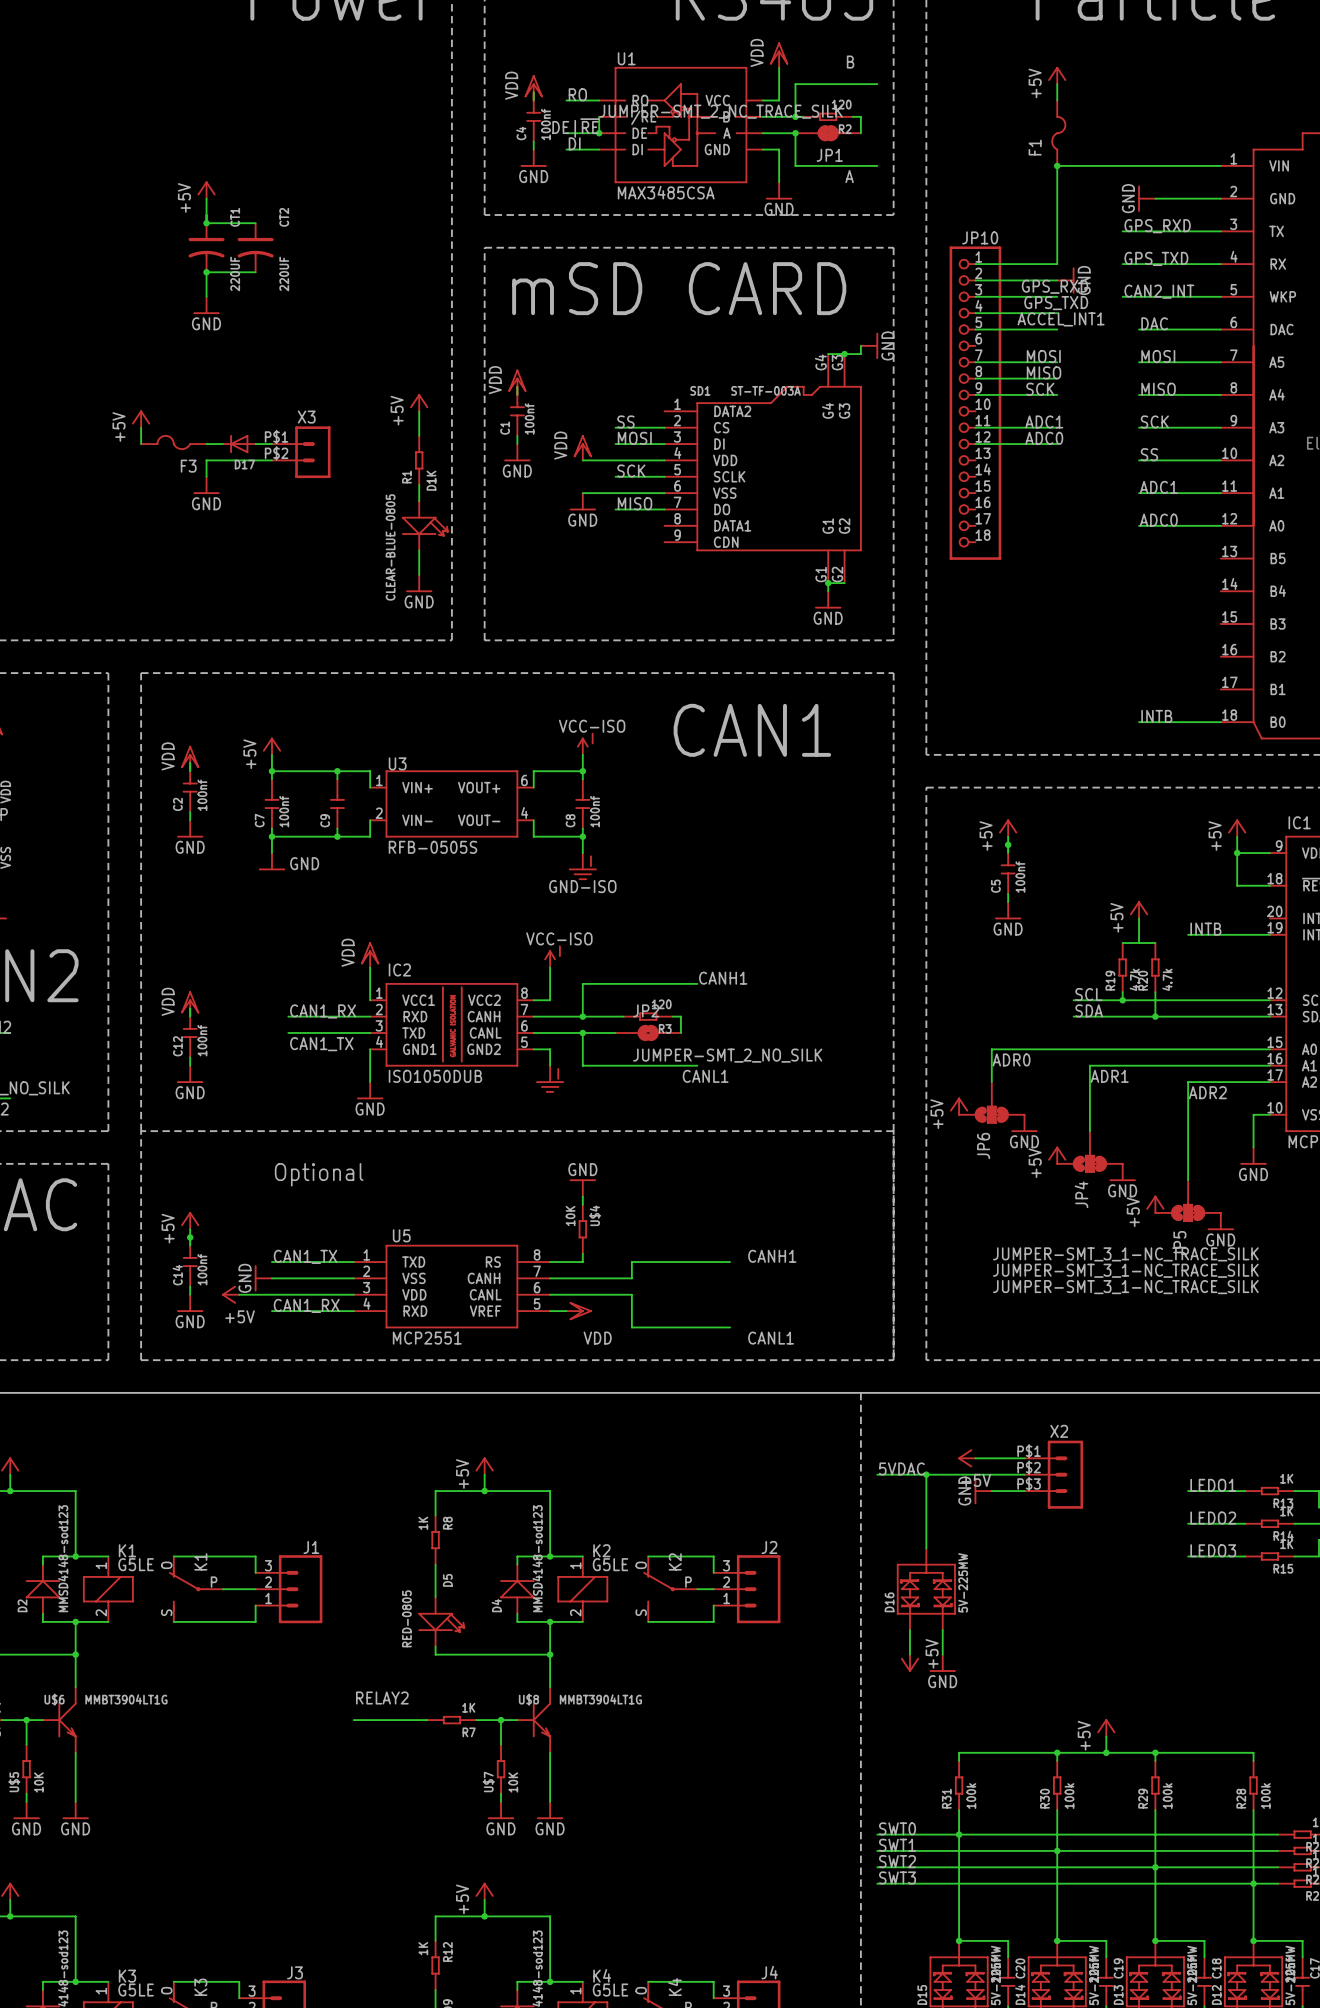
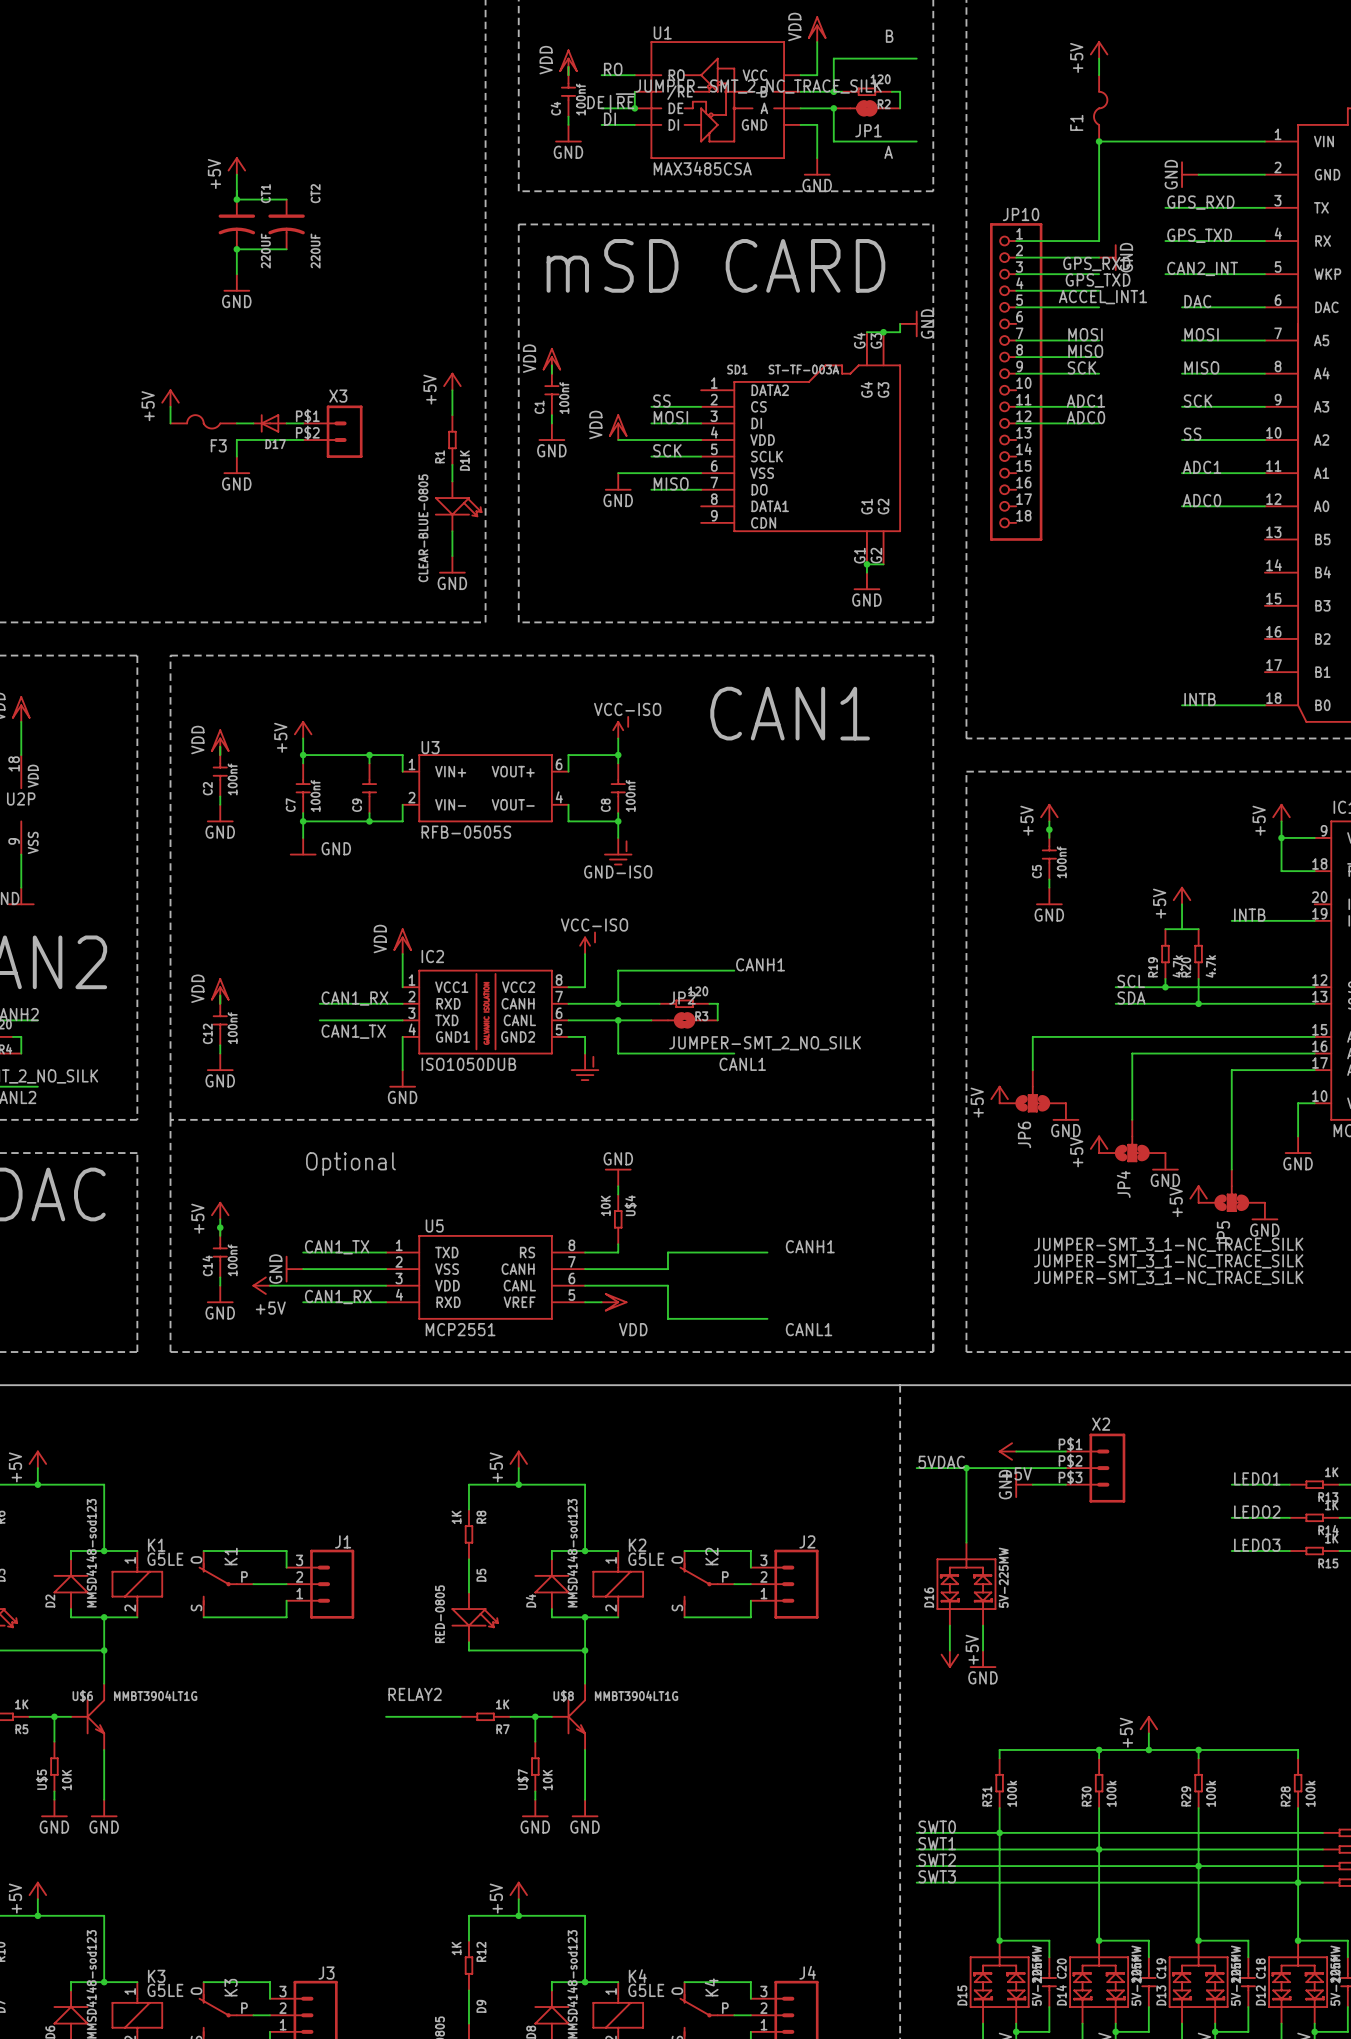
label: ADR0 (1011, 1059) -> none
label: ADR1 (1109, 1076) -> none
label: ADR2 (1207, 1092) -> none

